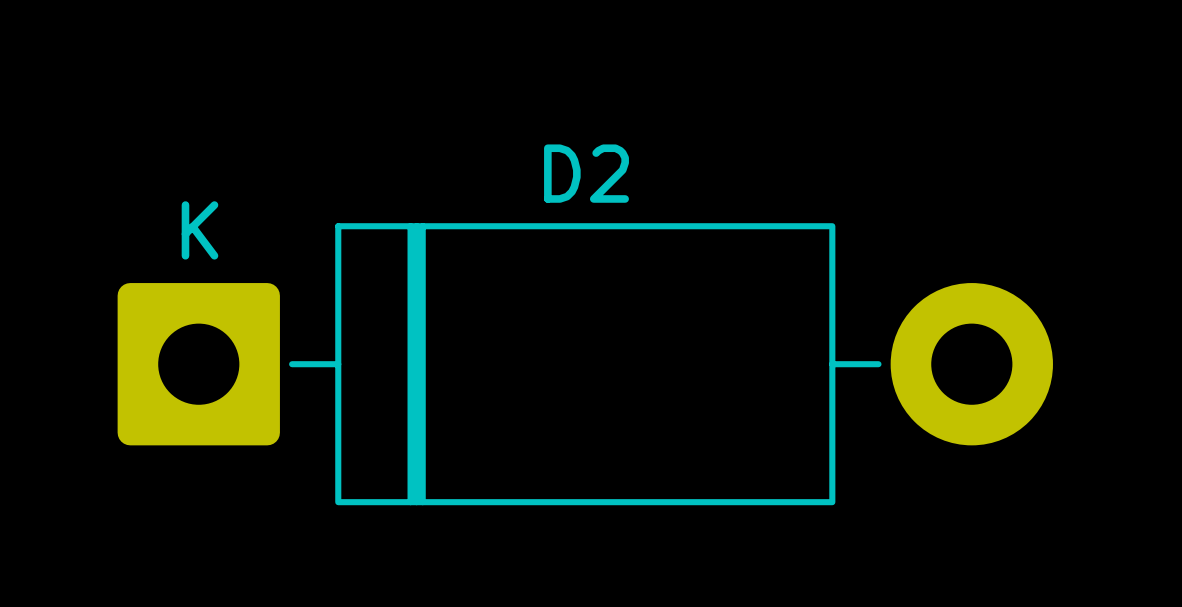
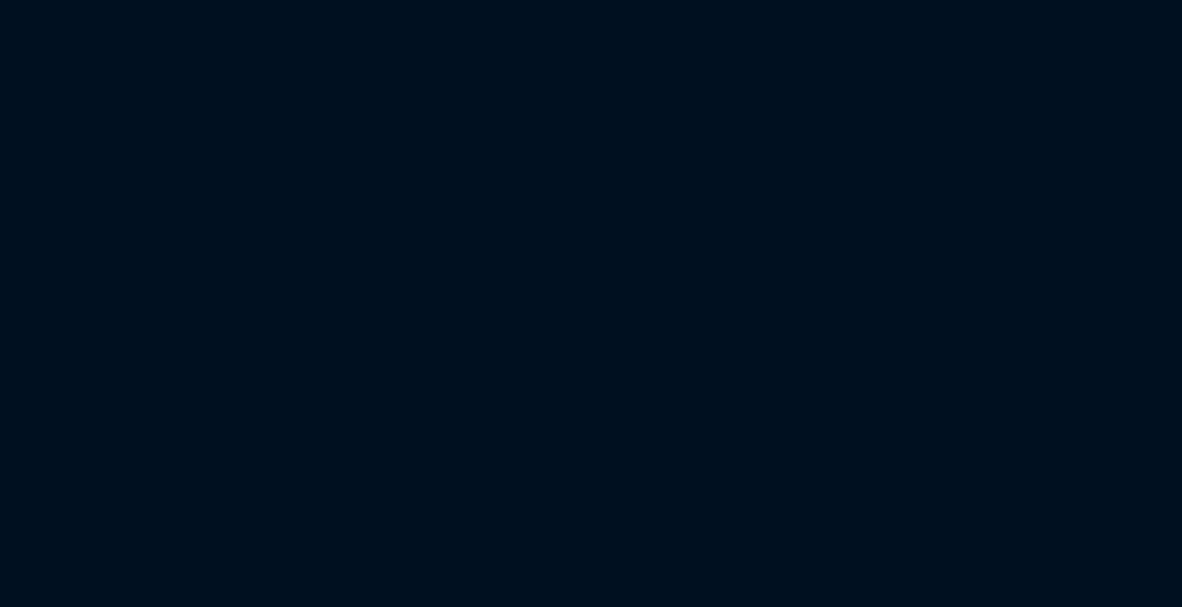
D2: (585, 364) -> none

